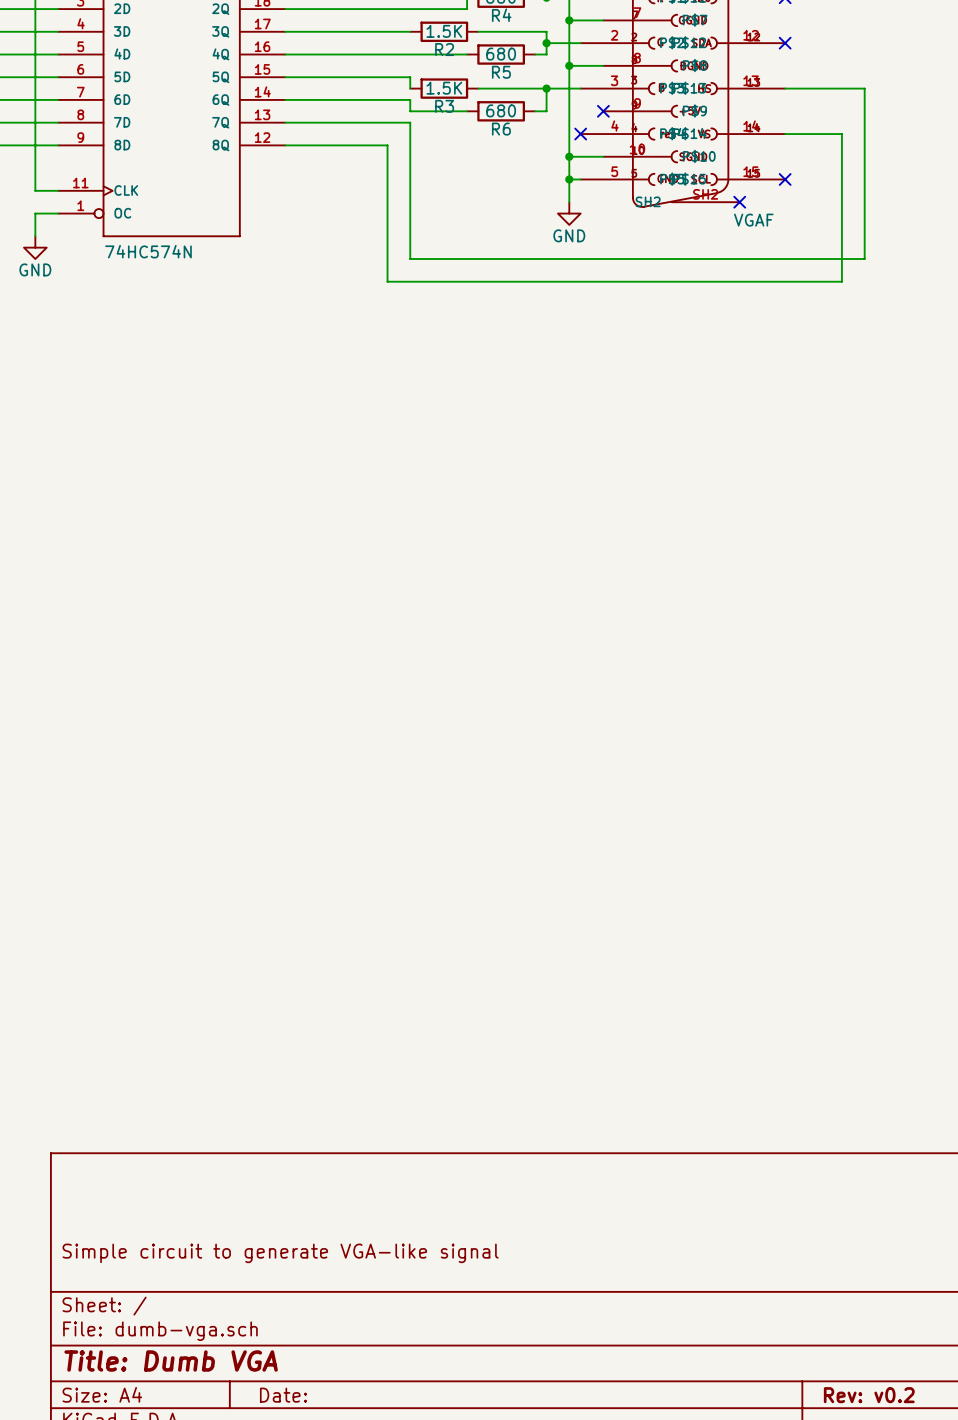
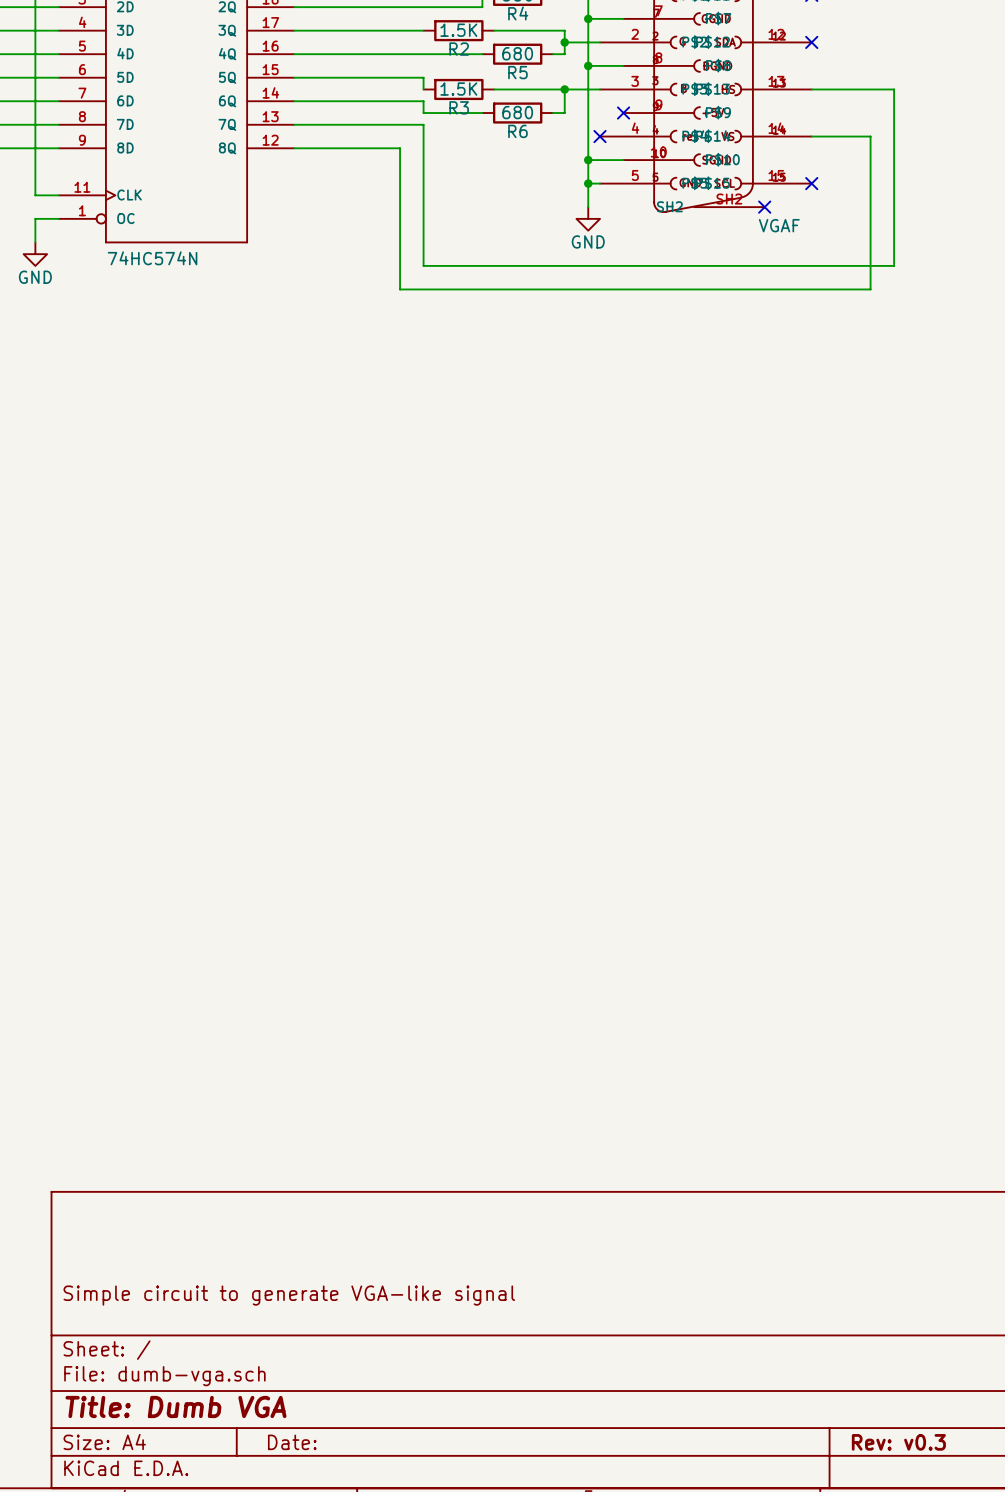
title block: Rev: v0.2 (869, 1395) -> Rev: v0.3 (898, 1442)

